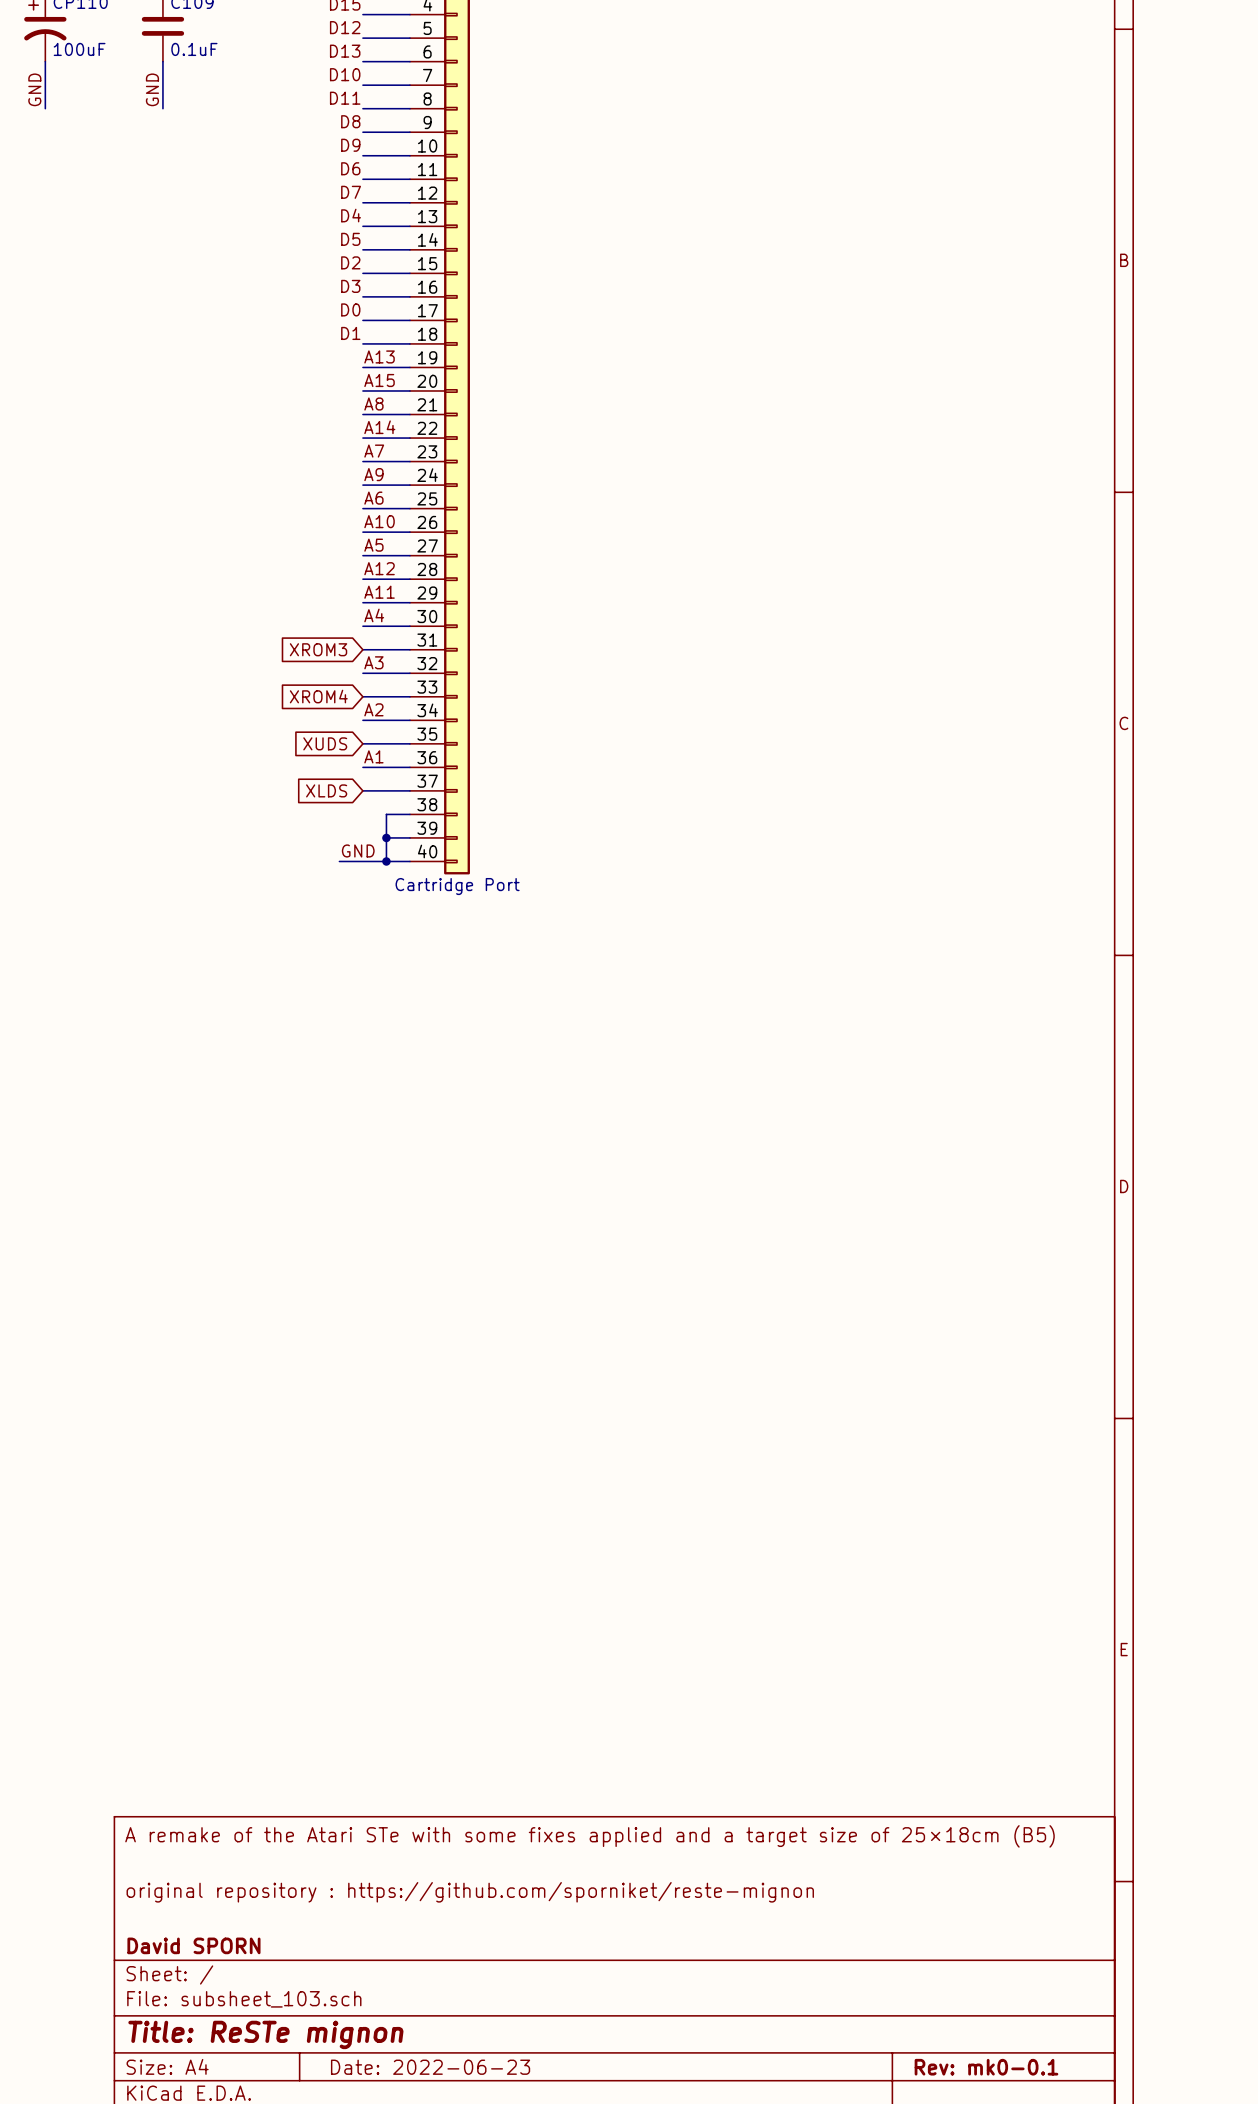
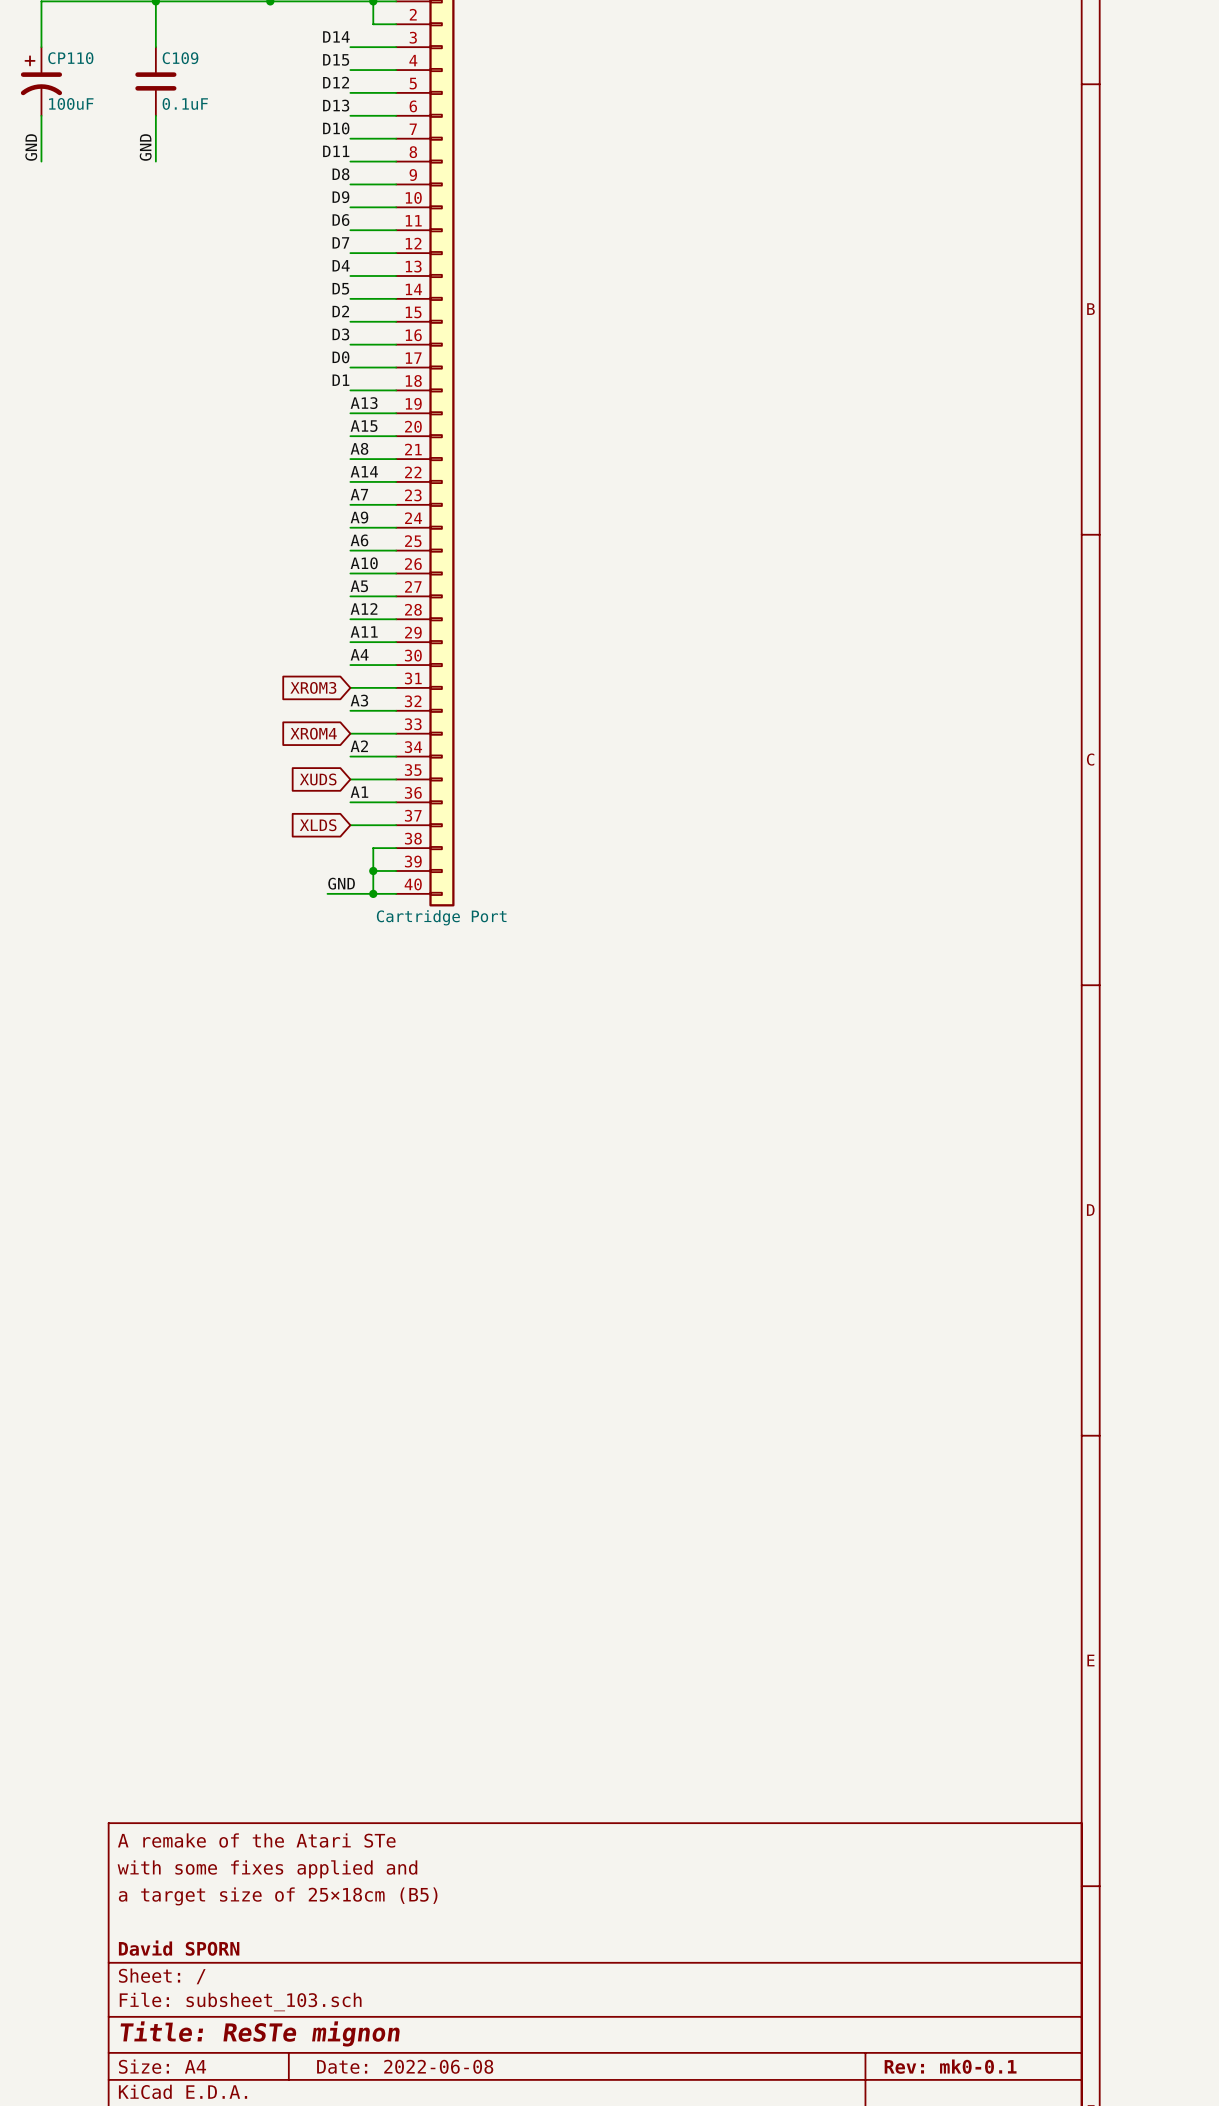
title block: A remake of the Atari STe with some fixes applied and a target size of 25×18cm (B5) (589, 1836) -> A remake of the Atari STe (256, 1840)
title block: none -> with some fixes applied and (267, 1869)
title block: original repository : https://github.com/sporniket/reste-mignon (470, 1892) -> a target size of 25×18cm (B5) (278, 1896)
title block: Date: 2022-06-23 (430, 2067) -> Date: 2022-06-08 (405, 2066)

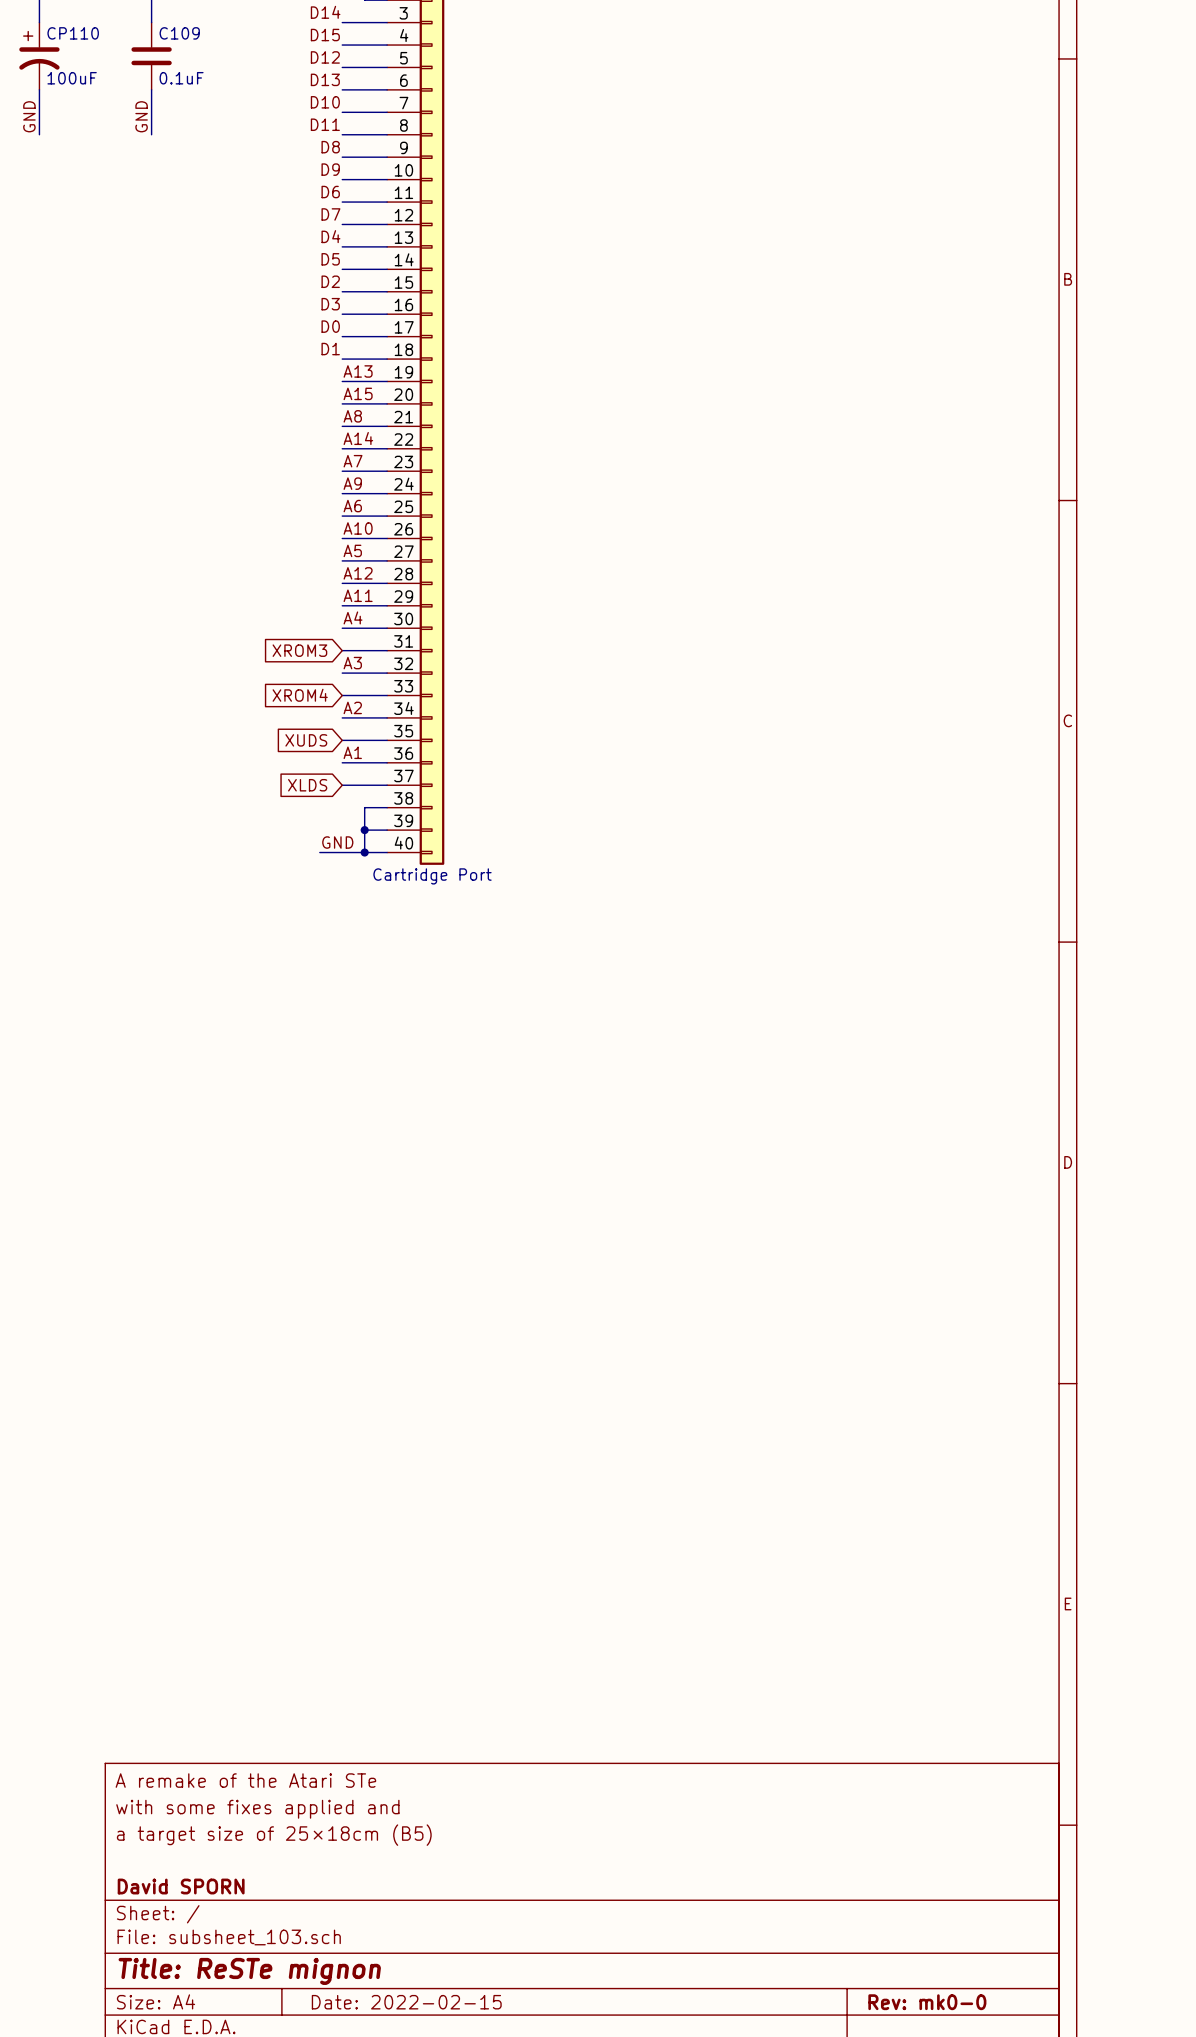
title block: Date: 2022-06-08 (405, 2066) -> Date: 2022-02-15 (406, 2002)
title block: Rev: mk0-0.1 (950, 2066) -> Rev: mk0-0 (927, 2002)

